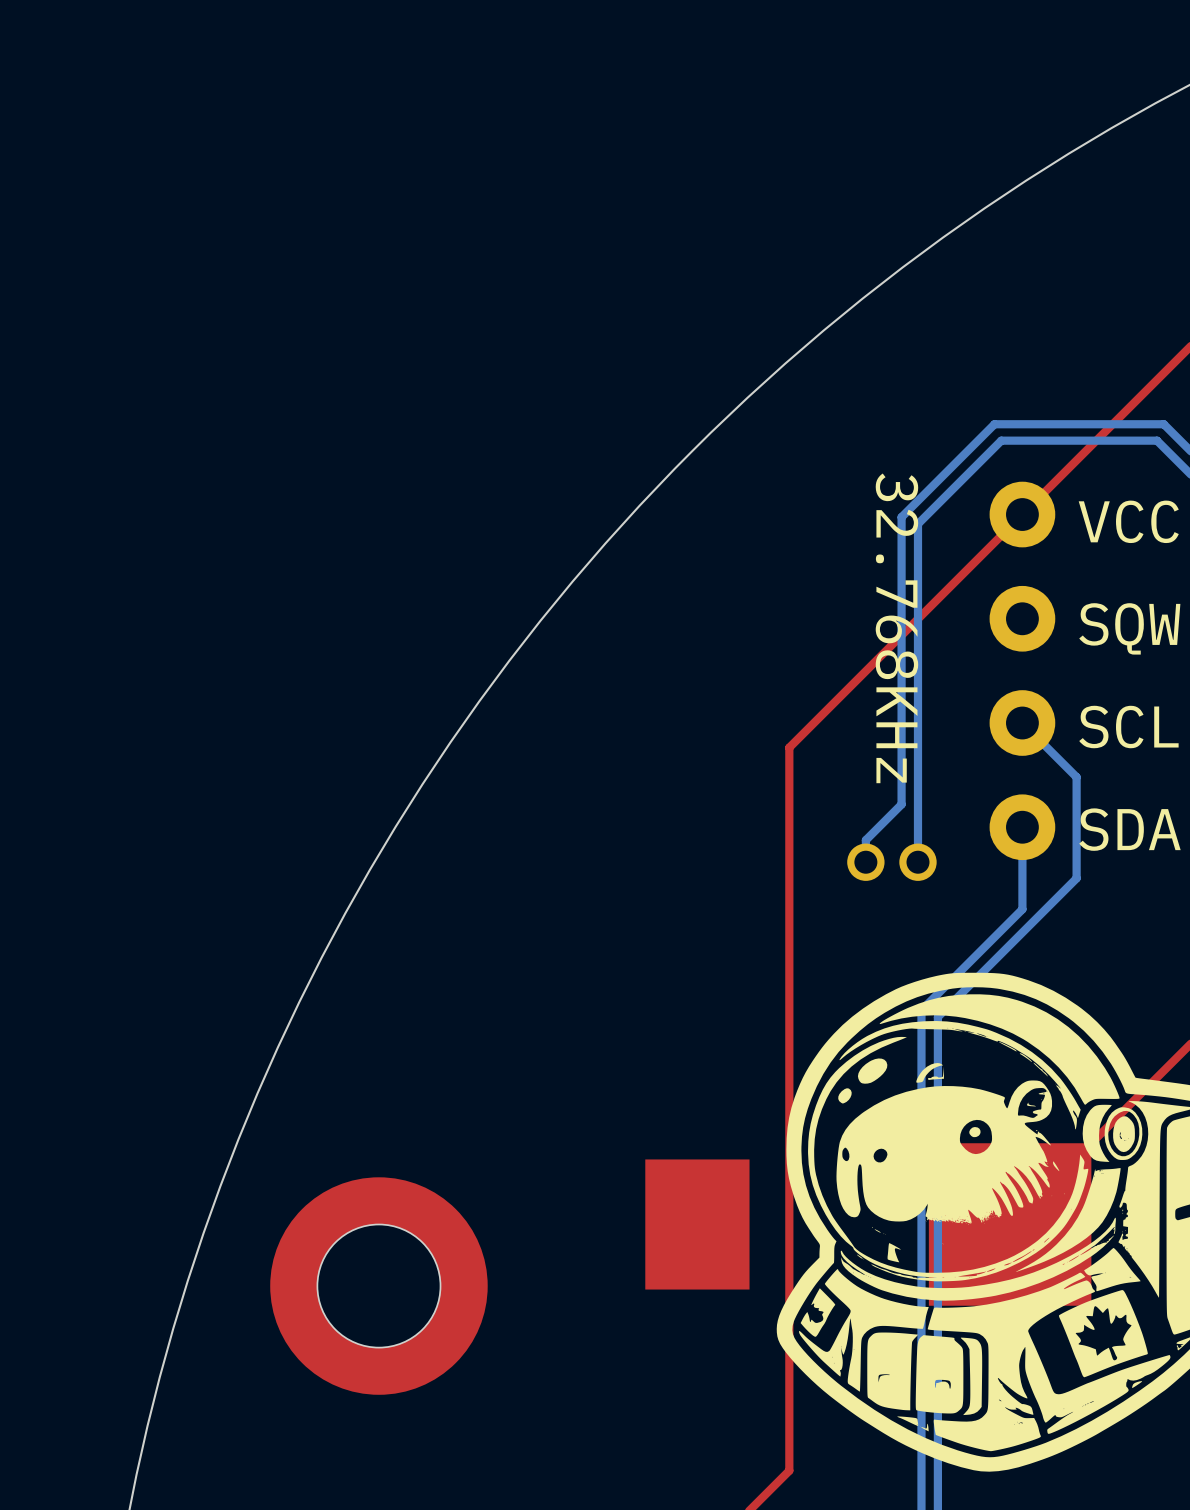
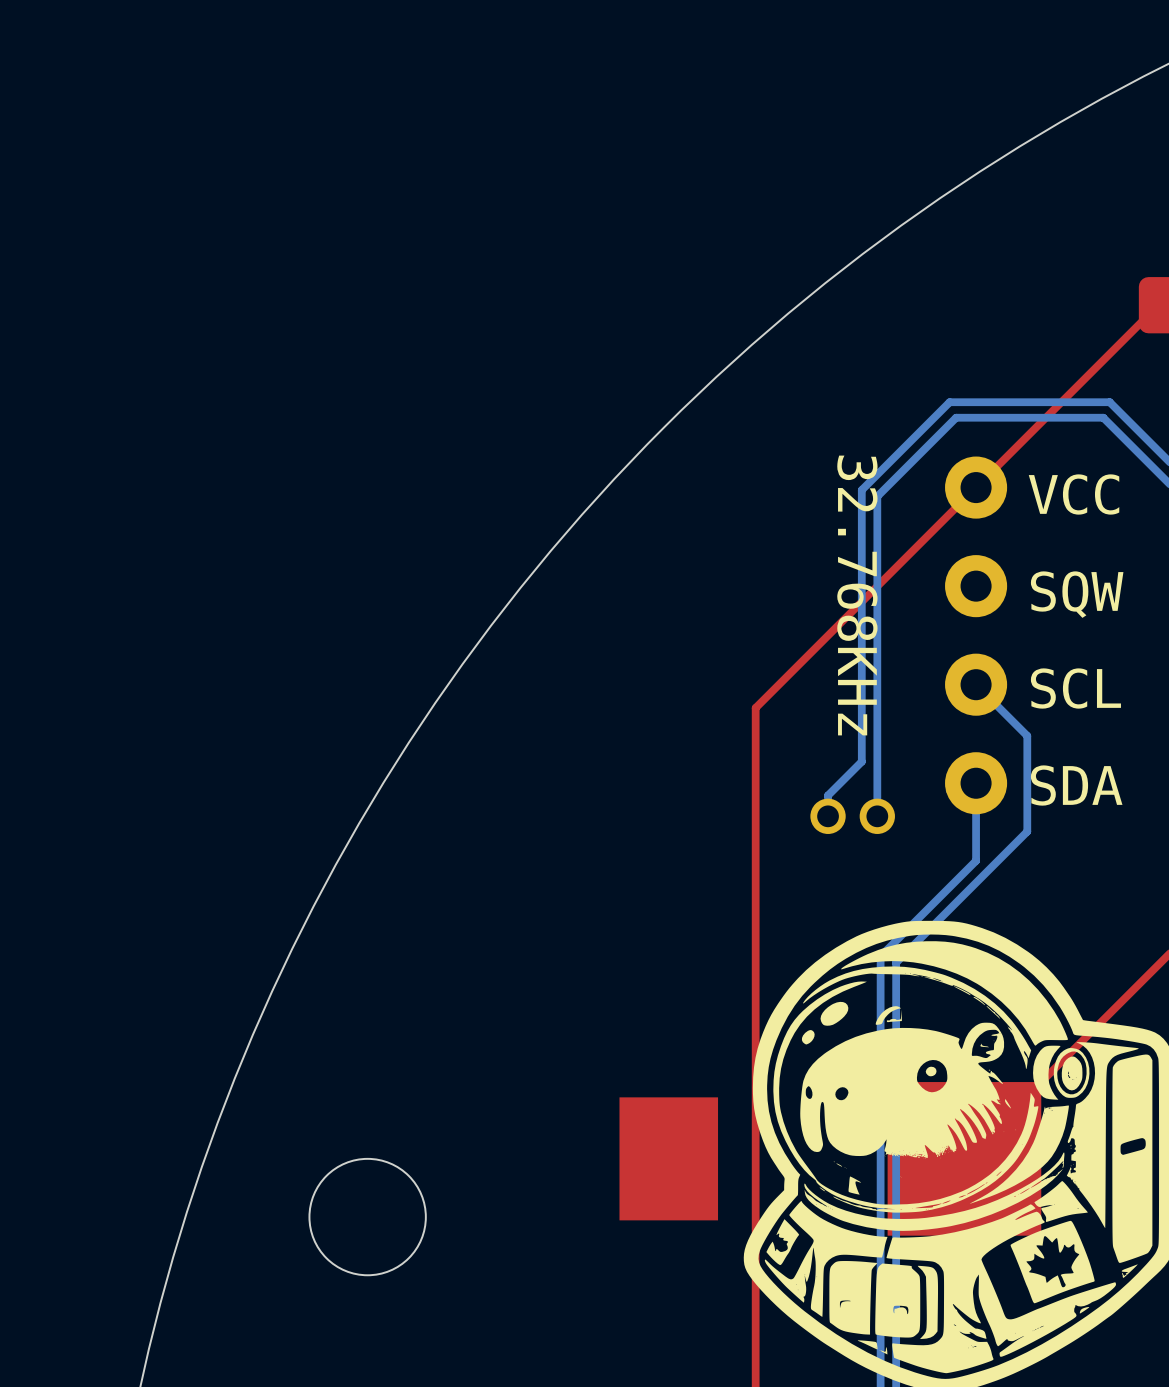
round board edge: none -> [308, 1157, 427, 1277]
part: (378, 1286) -> none

